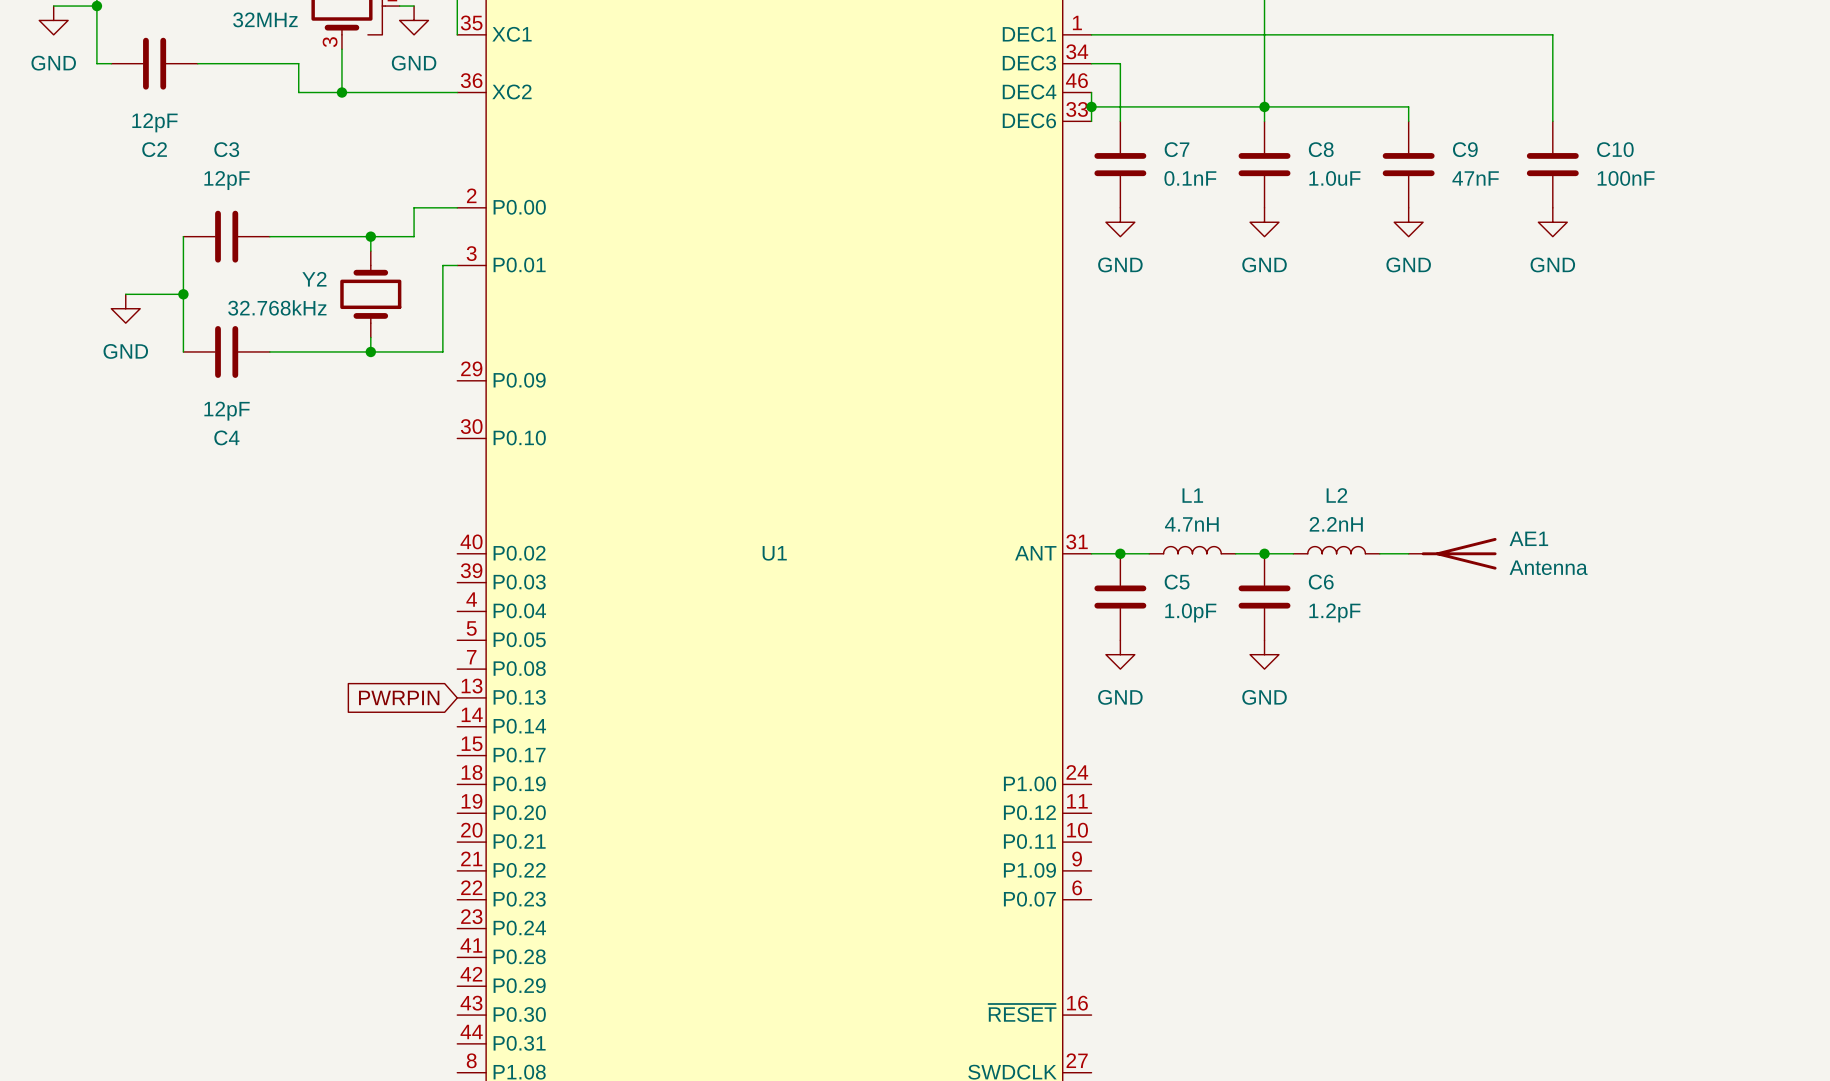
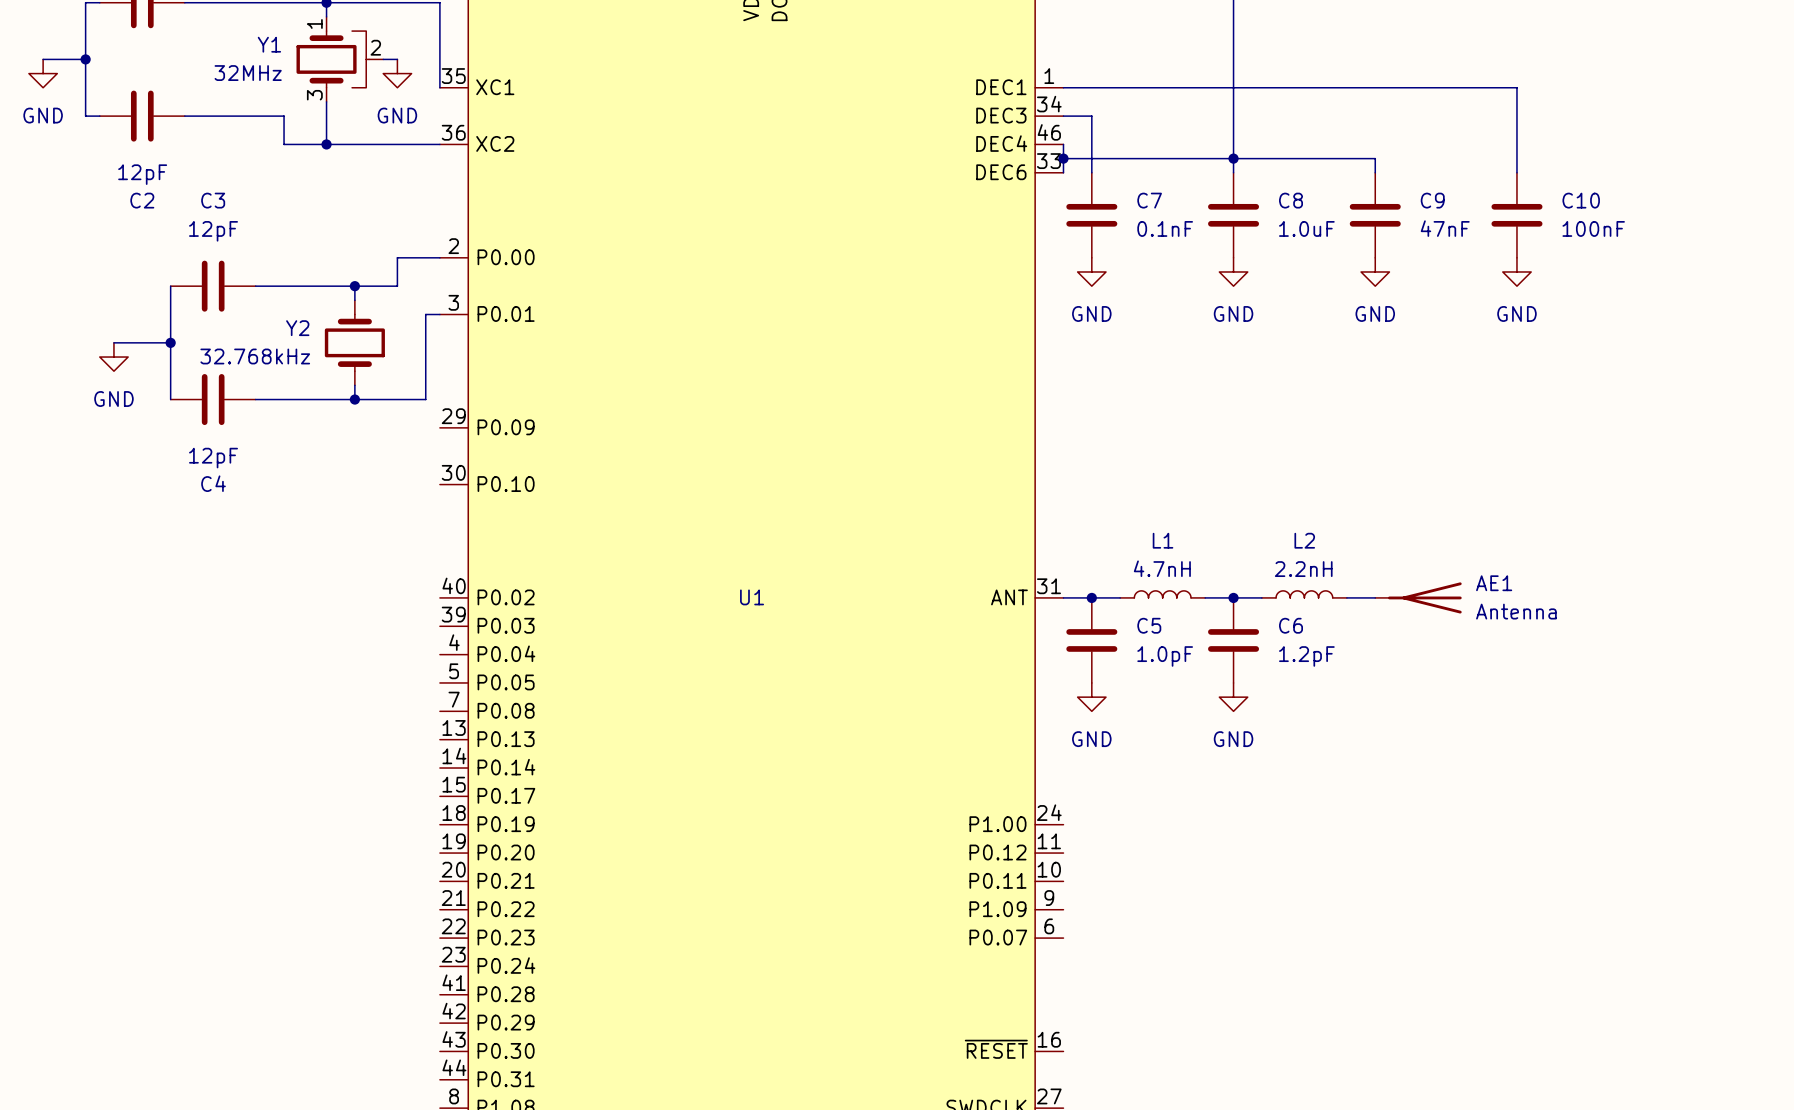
global label: PWRPIN (399, 697) -> none

